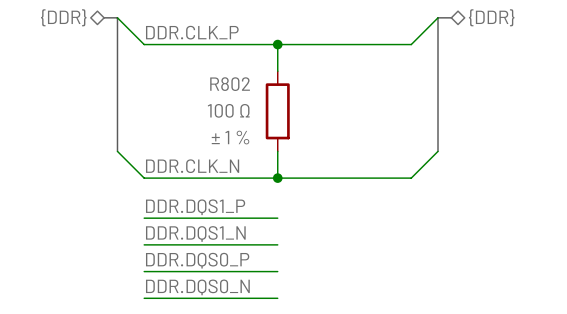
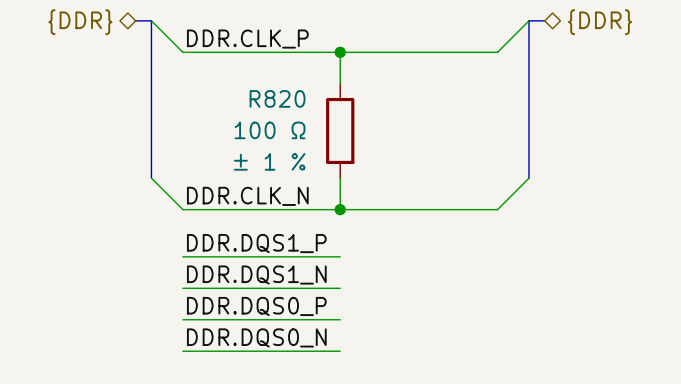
R802 name: R802 (230, 84) -> R820 (277, 98)

